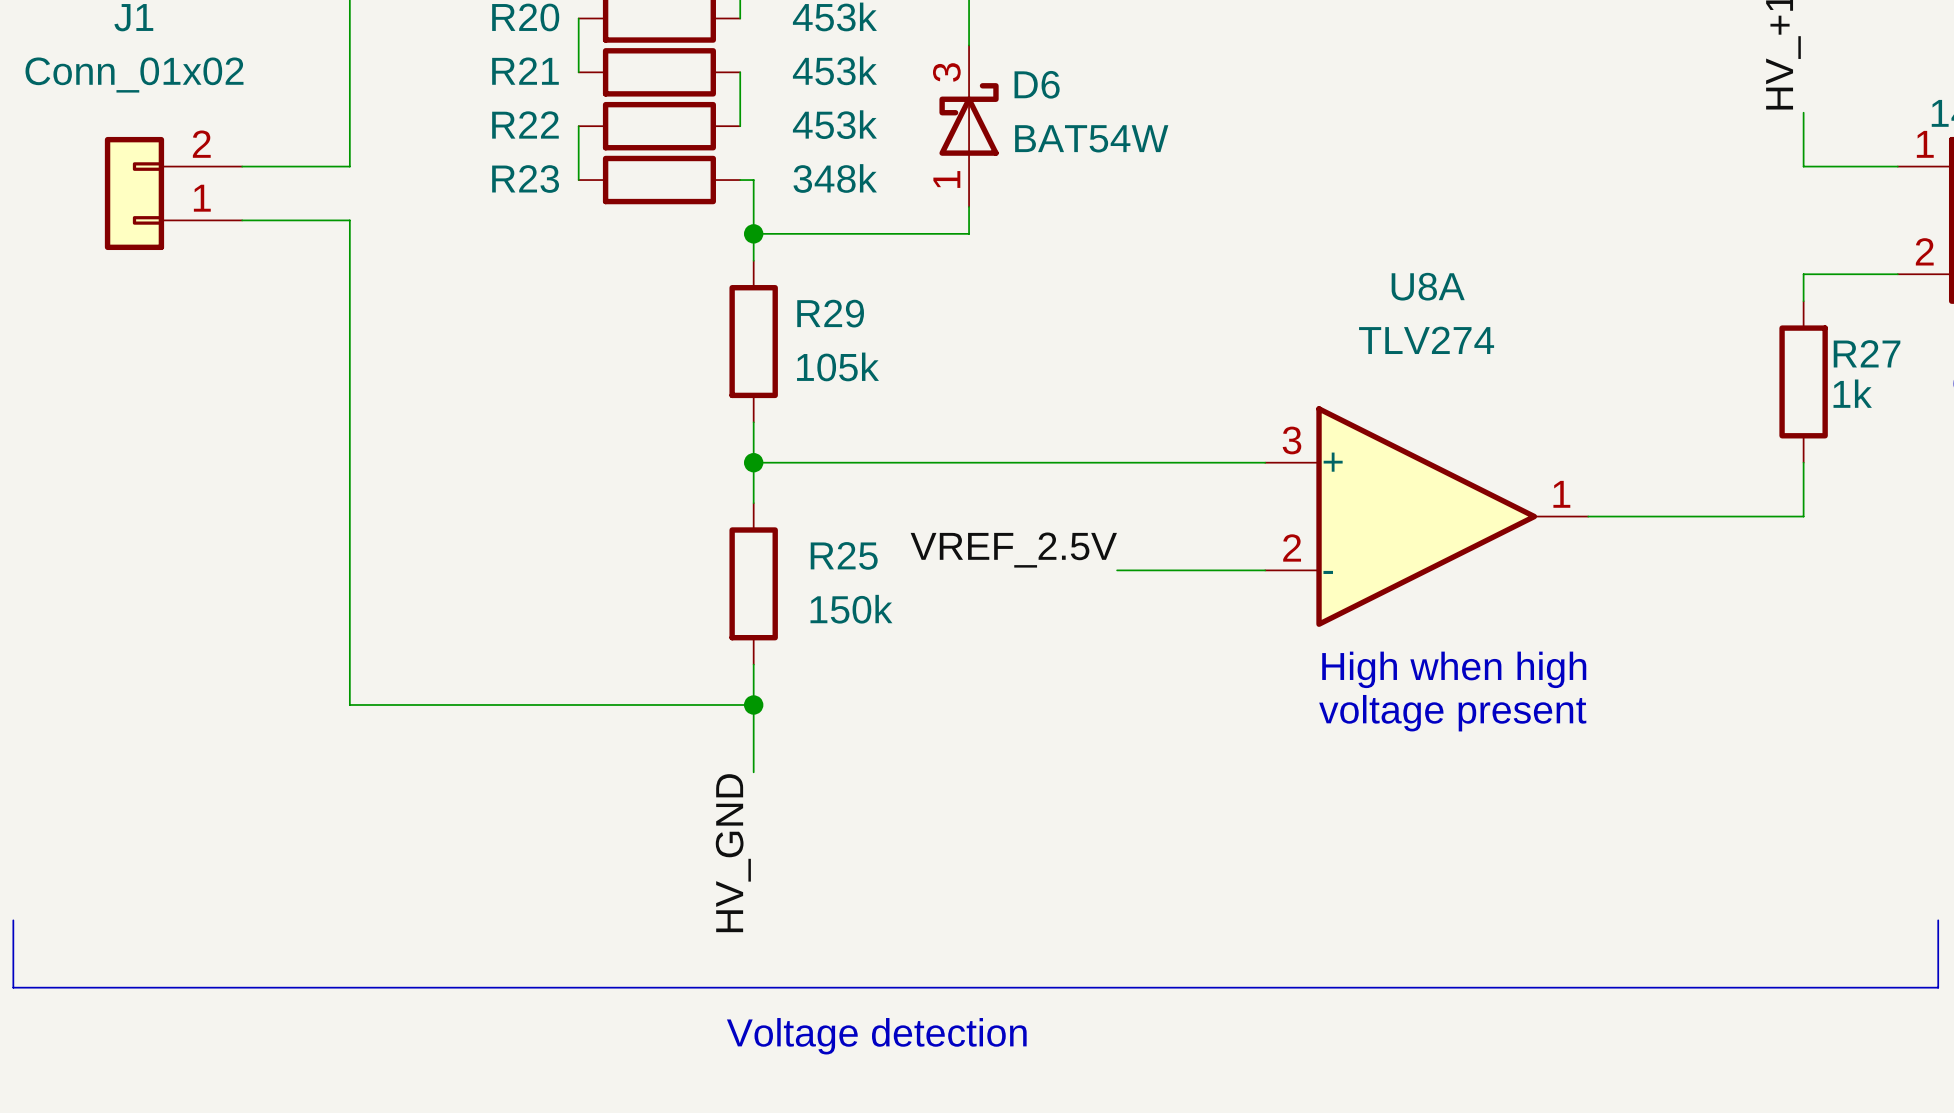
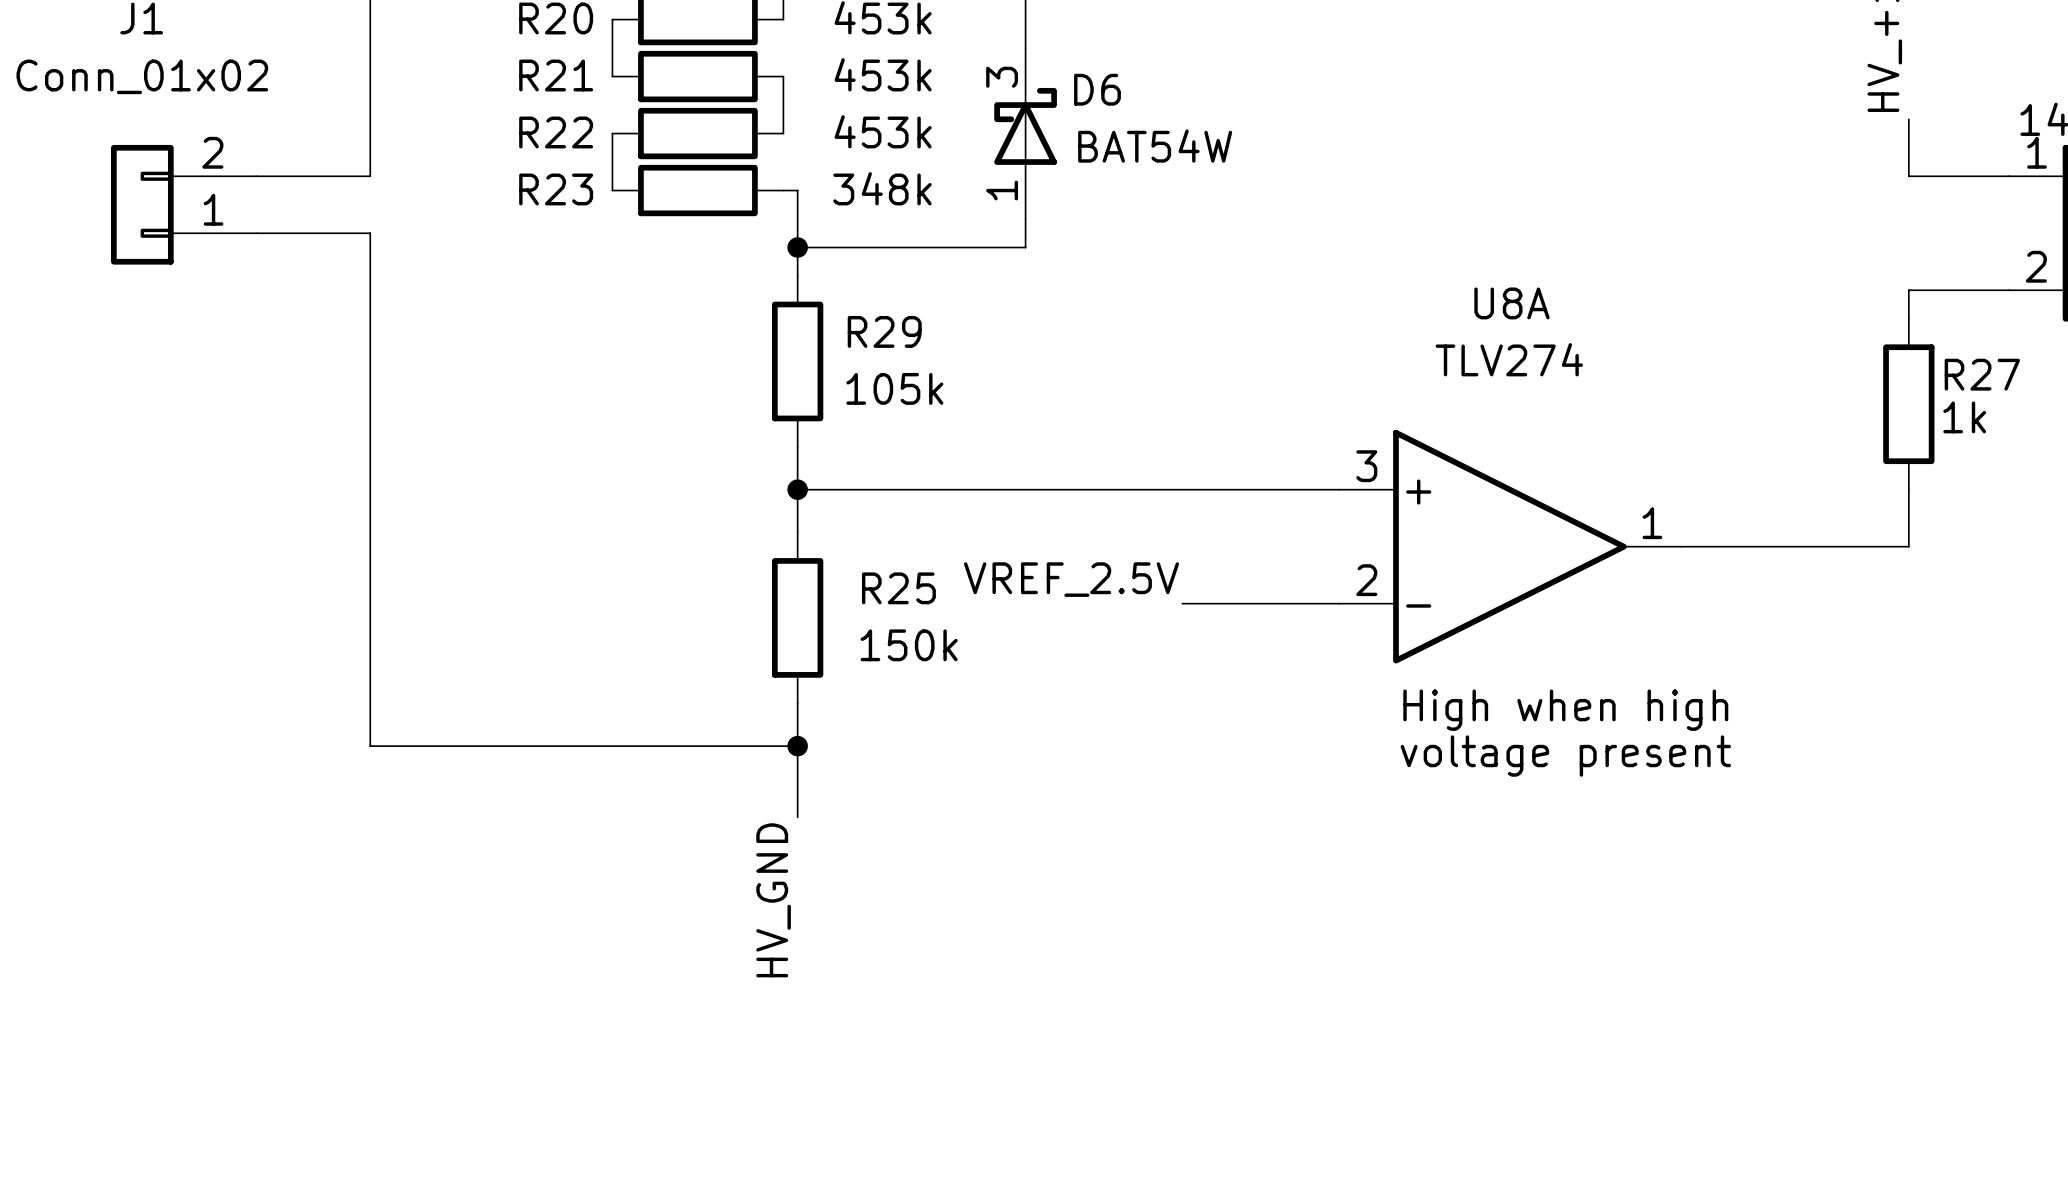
line: (13, 920) (13, 987) (1938, 987) (1938, 920) -> none
text: Voltage detection (876, 1036) -> none

